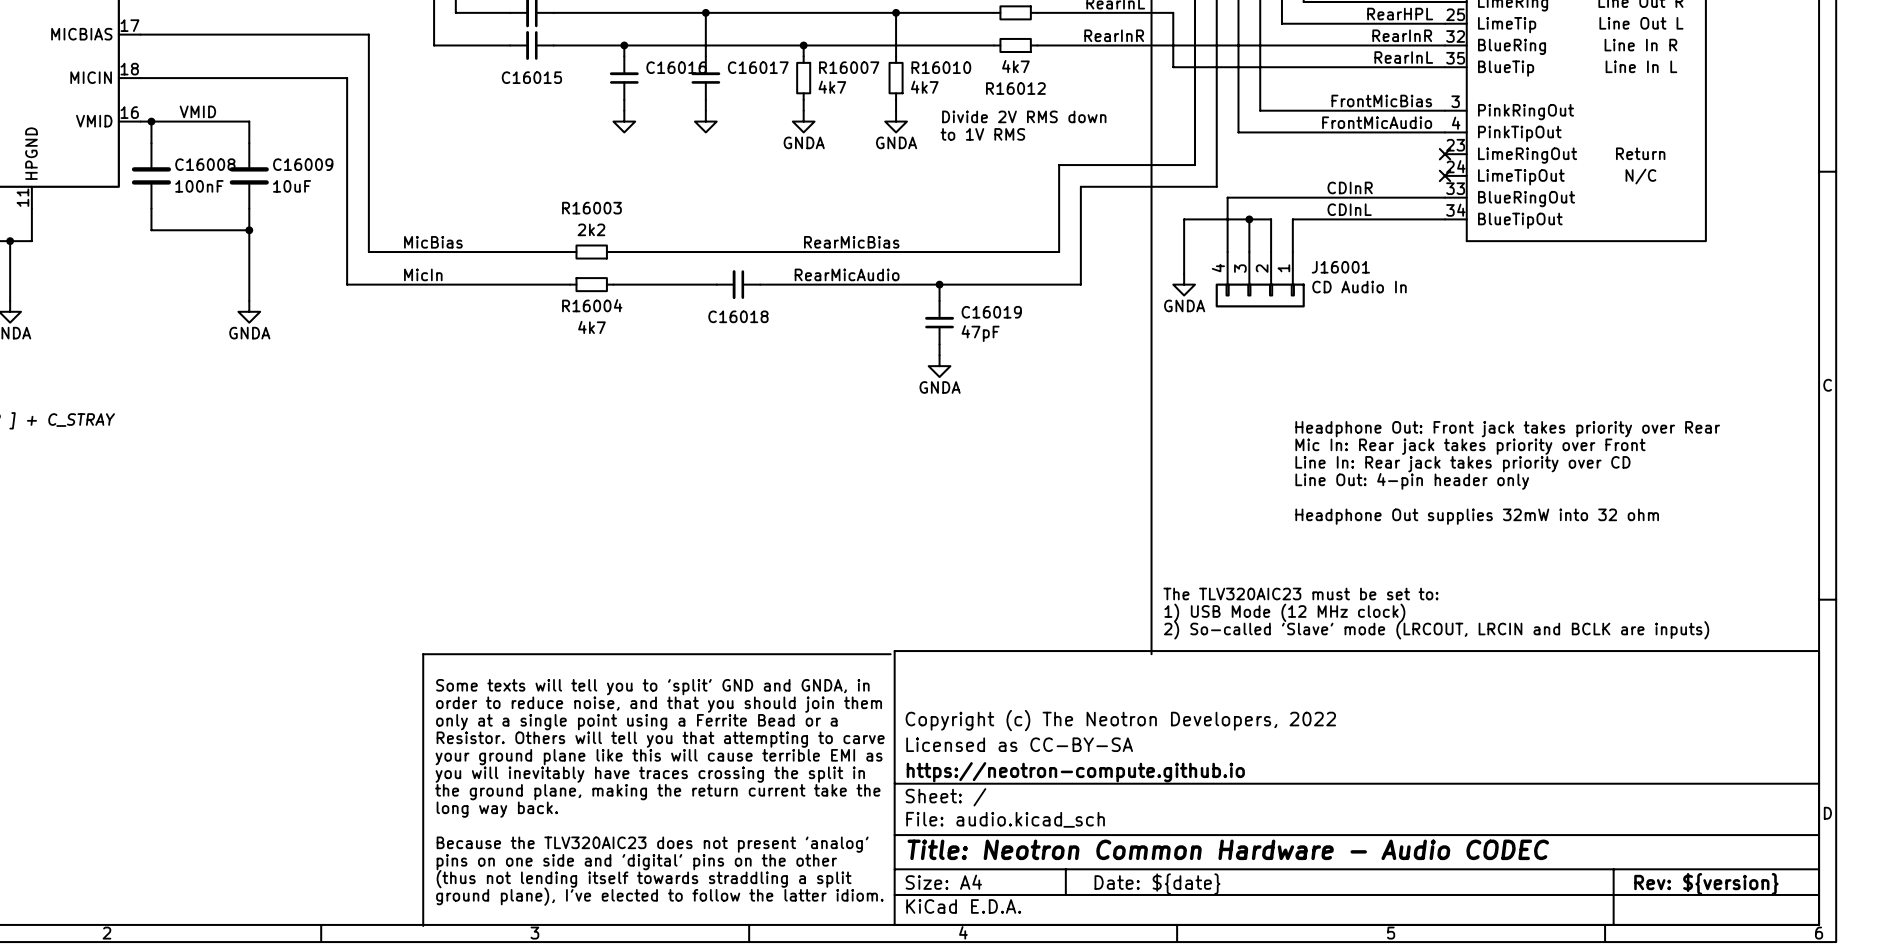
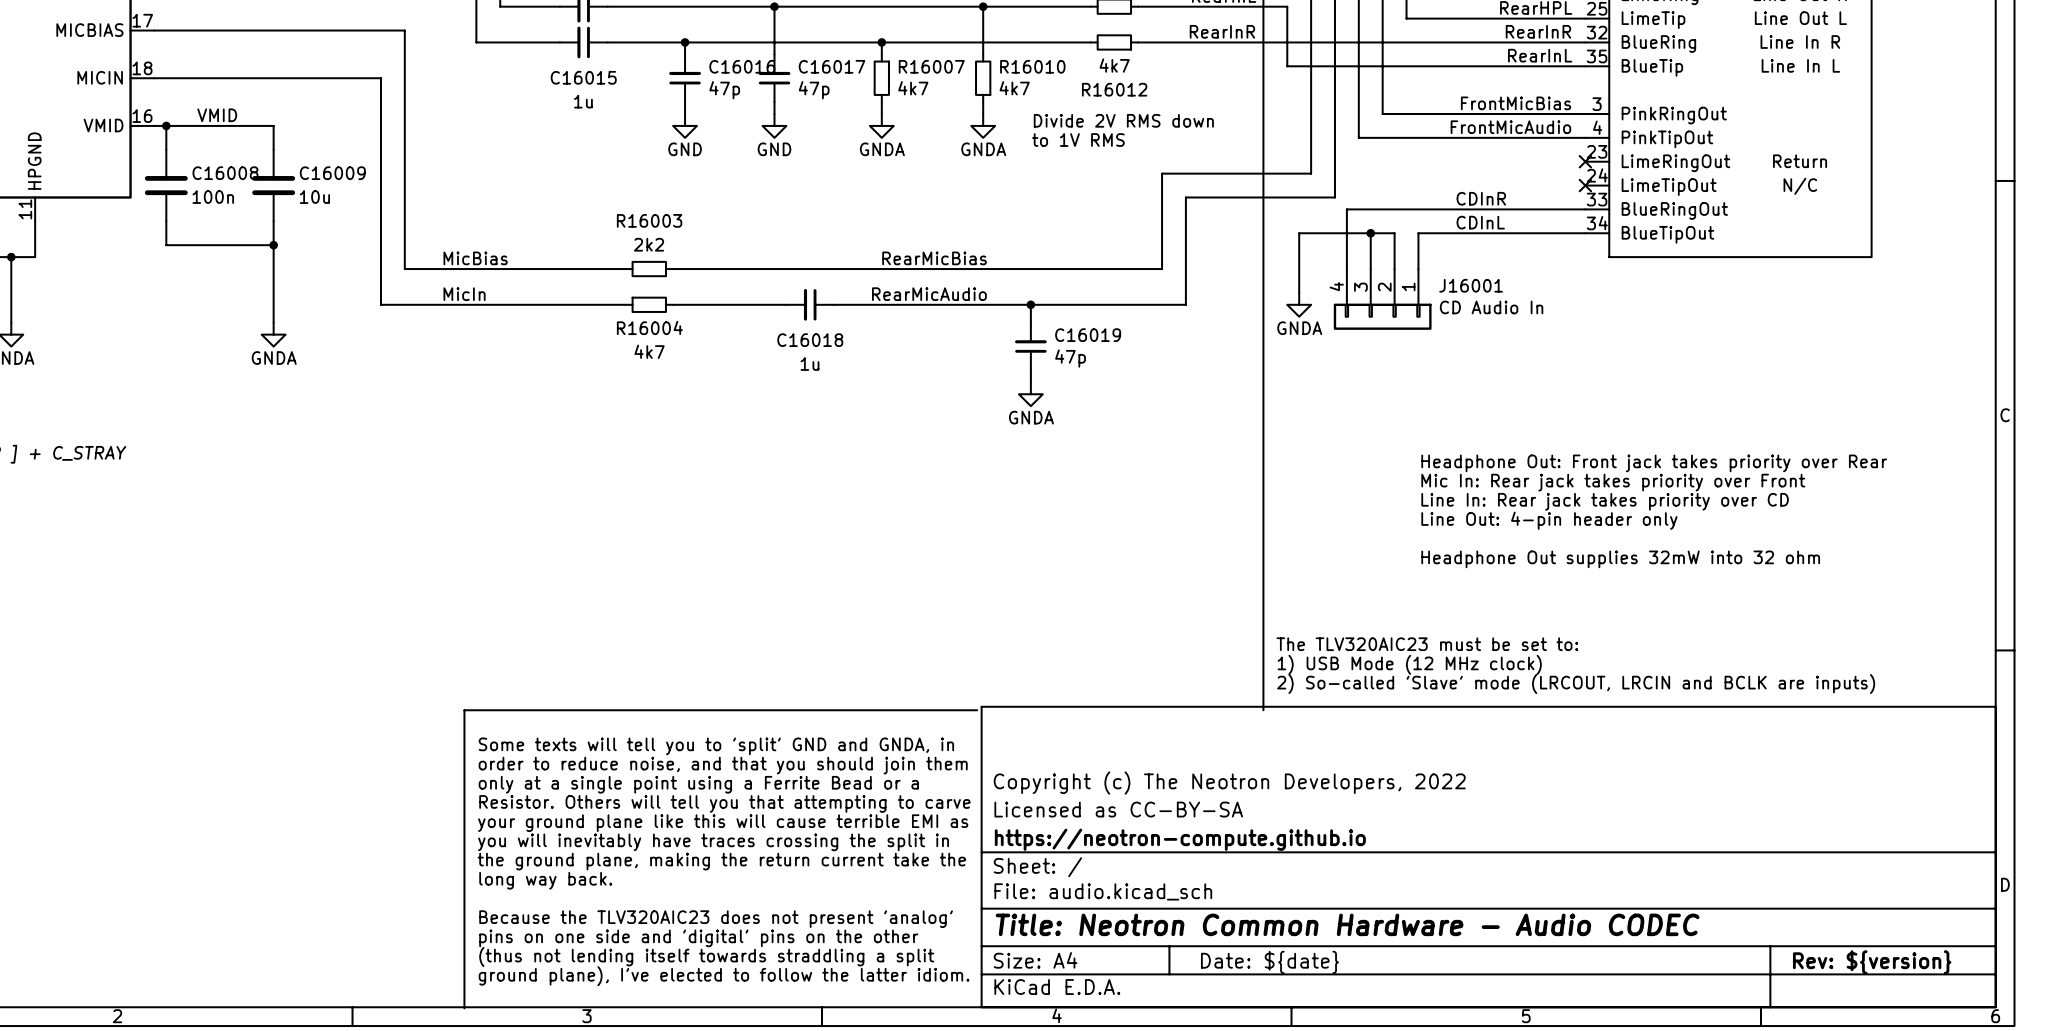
C16016 value: none -> 47p (724, 90)
C16017 value: none -> 47p (814, 90)
C16015 value: none -> 1u (583, 101)
power symbol text: none -> GND (685, 149)
power symbol text: none -> GND (774, 149)
C16008 value: 100nF (199, 186) -> 100n (213, 197)
C16009 value: 10uF (292, 186) -> 10u (314, 197)
C16019 value: 47pF (980, 333) -> 47p (1070, 358)
C16018 value: none -> 1u (809, 363)

